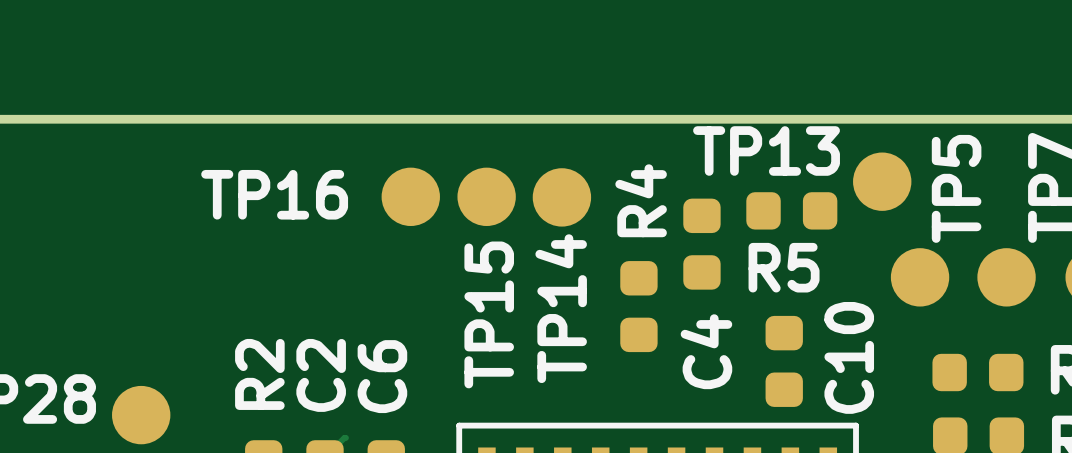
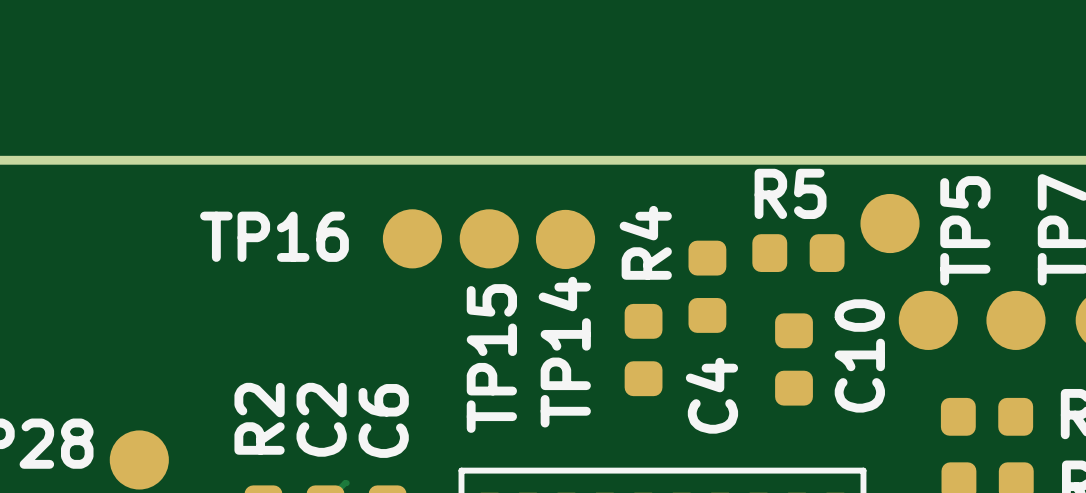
TP13 name: TP13 (766, 150) -> none
R5 name position: R5 (784, 267) -> R5 (790, 193)
C10 position: (784, 361) -> (794, 359)

